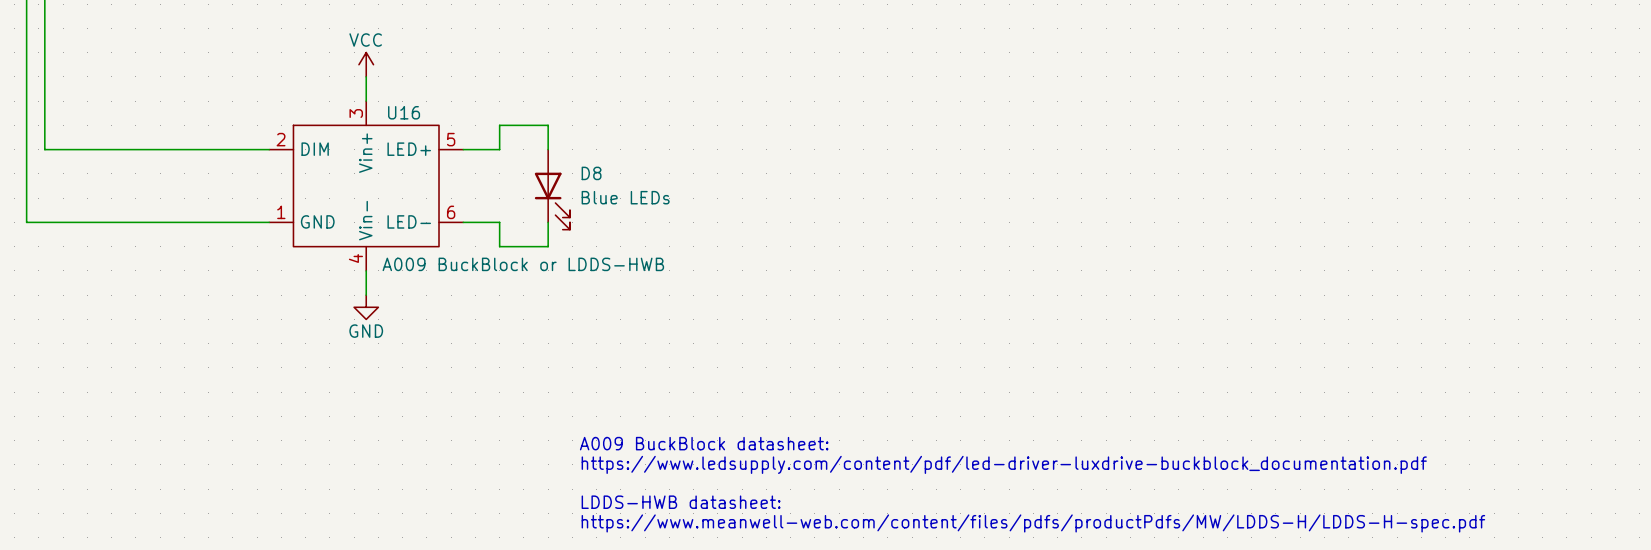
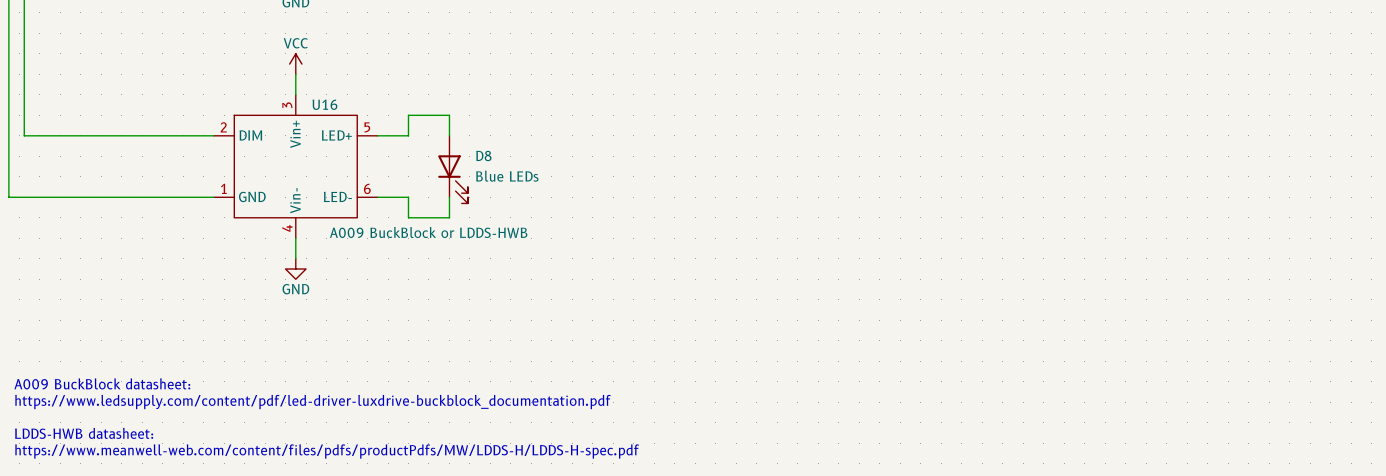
text: none -> A009 BuckBlock datasheet: (102, 383)
text: A009 BuckBlock datasheet: (704, 443) -> none
text: none -> https://www.ledsupply.com/content/pdf/led-driver-luxdrive-buckblock_documentation.pdf (313, 402)
text: https://www.ledsupply.com/content/pdf/led-driver-luxdrive-buckblock_documentation.pdf (1004, 464) -> none
text: none -> LDDS-HWB datasheet: (84, 433)
text: LDDS-HWB datasheet: (681, 502) -> none
text: none -> https://www.meanwell-web.com/content/files/pdfs/productPdfs/MW/LDDS-H/LDDS-H-spec.pdf (327, 451)
text: https://www.meanwell-web.com/content/files/pdfs/productPdfs/MW/LDDS-H/LDDS-H-spec.pdf (1033, 523) -> none

